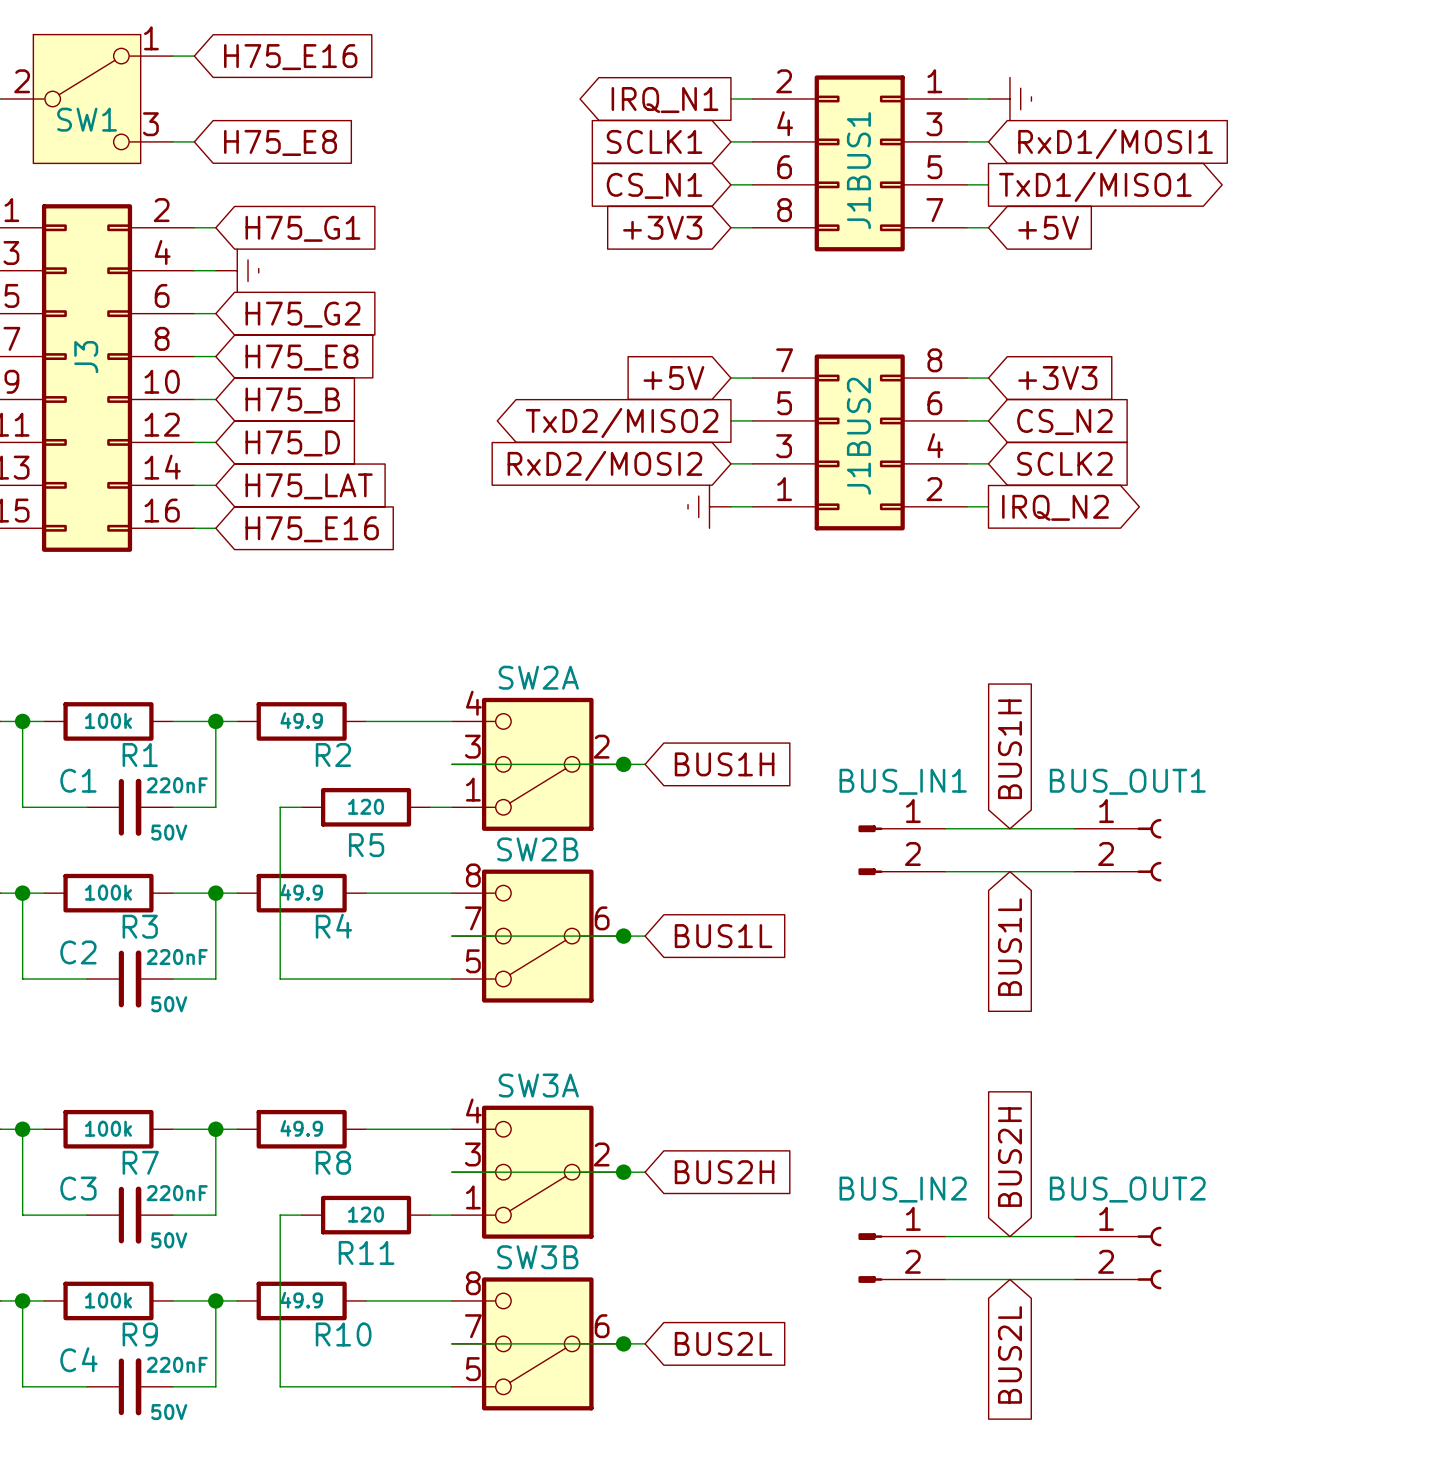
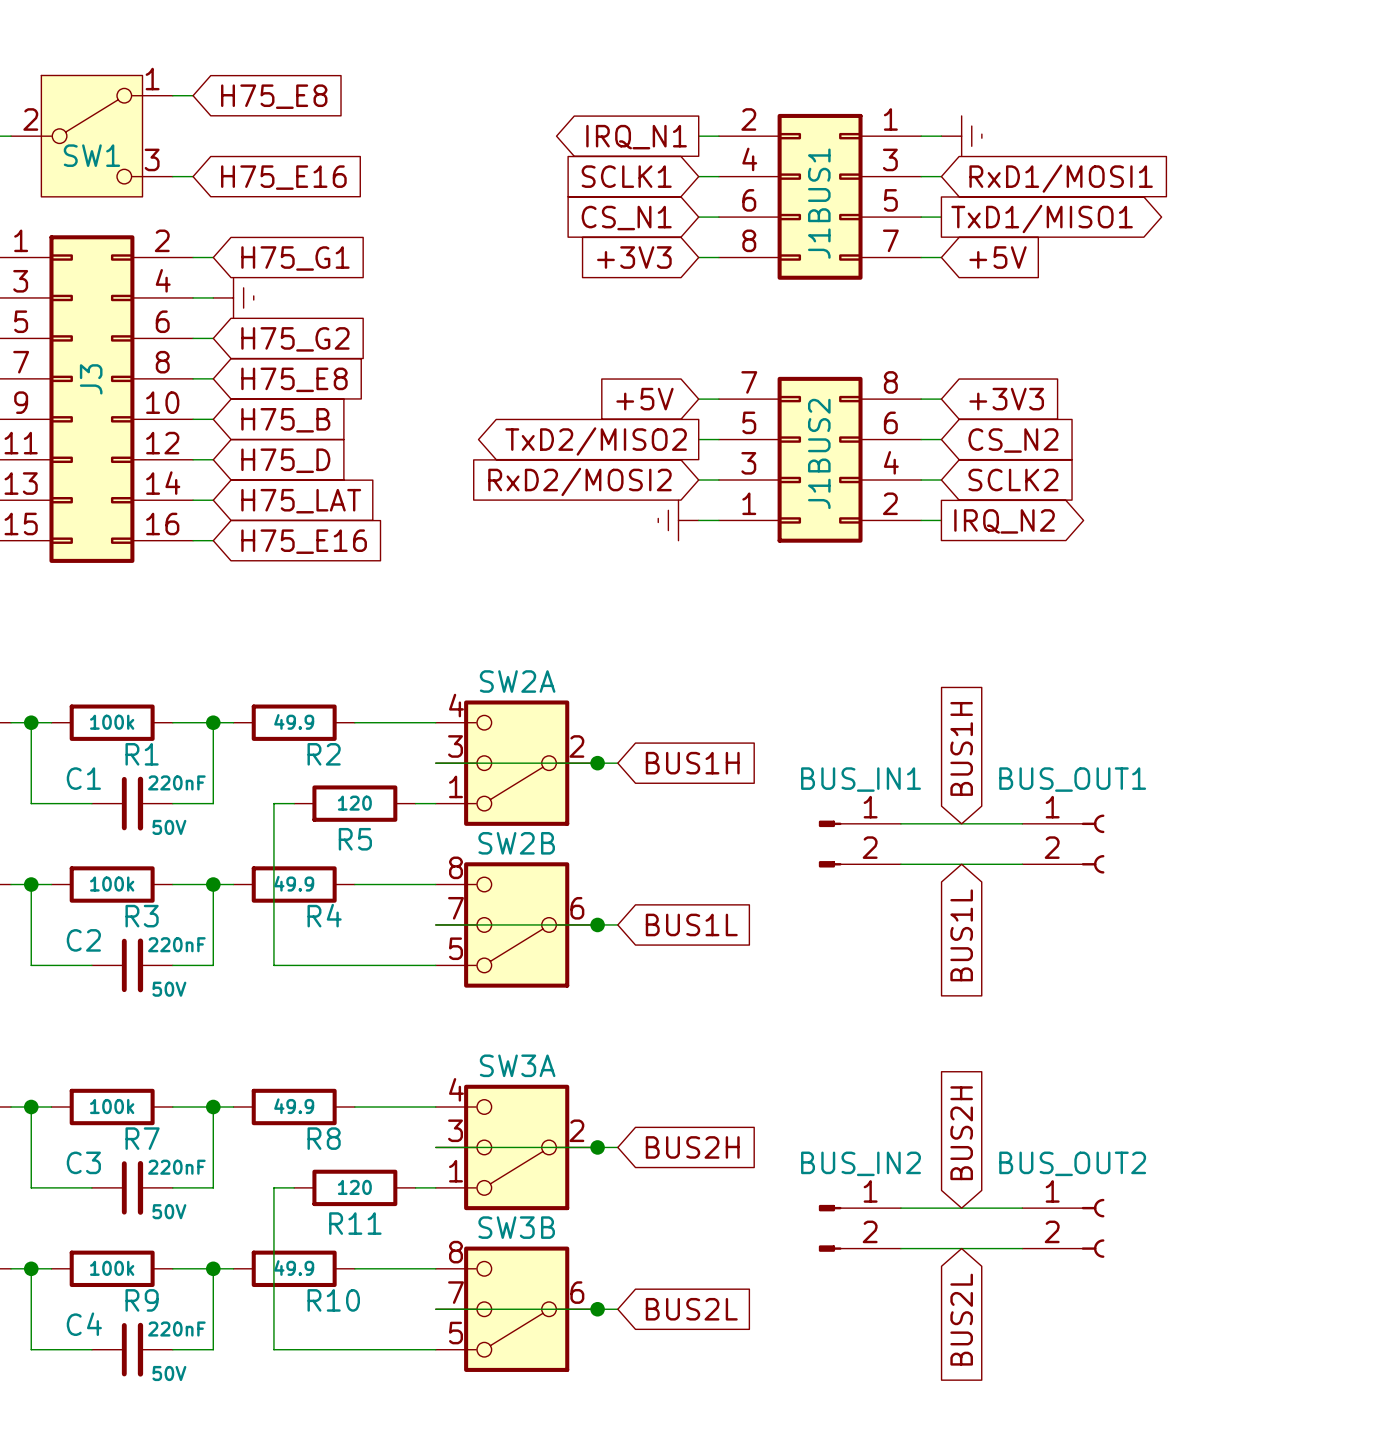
global label: H75_E16 (290, 57) -> H75_E8 (274, 96)
global label: H75_E8 (280, 142) -> H75_E16 (283, 177)

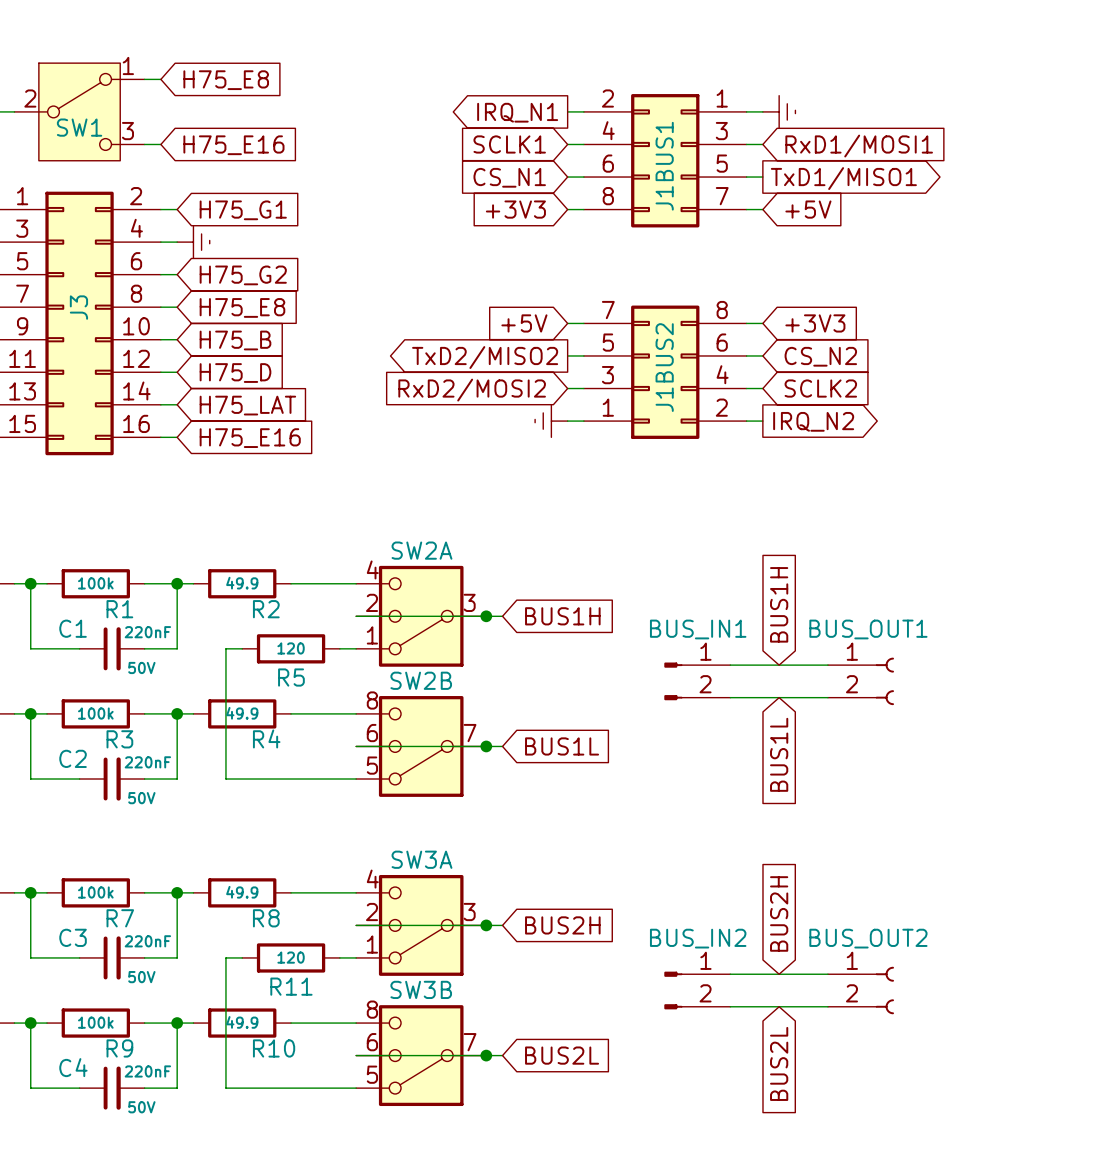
SW2A pin number: 3 (455, 746) -> 2 (372, 602)
SW2A pin number: 2 (576, 746) -> 3 (469, 602)
SW2B pin number: 7 (456, 908) -> 6 (372, 733)
SW2B pin number: 6 (577, 908) -> 7 (470, 733)
SW3A pin number: 3 (455, 1130) -> 2 (372, 912)
SW3A pin number: 2 (576, 1130) -> 3 (469, 912)
SW3B pin number: 7 (456, 1292) -> 6 (372, 1042)
SW3B pin number: 6 (577, 1292) -> 7 (470, 1042)

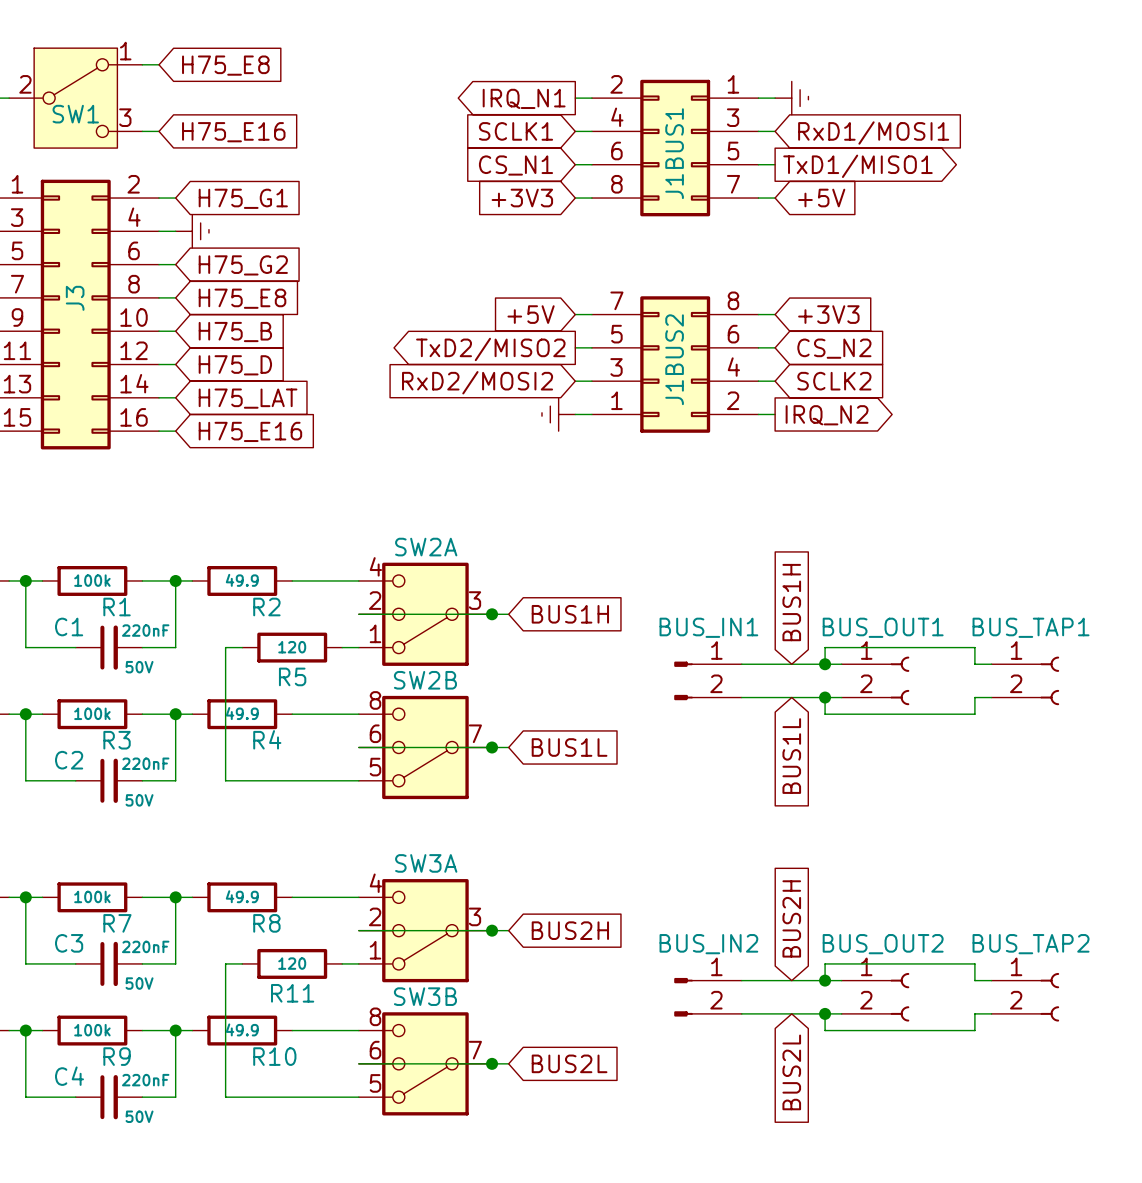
wire: none -> (825, 664) (825, 647) (974, 647) (974, 664) (991, 664)
junction: none -> (825, 664)
BUS_TAP1: none -> (1025, 680)
wire: none -> (825, 697) (825, 714) (974, 714) (974, 697) (991, 697)
junction: none -> (825, 697)
wire: none -> (825, 980) (825, 963) (974, 963) (974, 980) (991, 980)
junction: none -> (825, 980)
BUS_TAP2: none -> (1025, 997)
wire: none -> (825, 1013) (825, 1030) (974, 1030) (974, 1013) (991, 1013)
junction: none -> (825, 1013)

